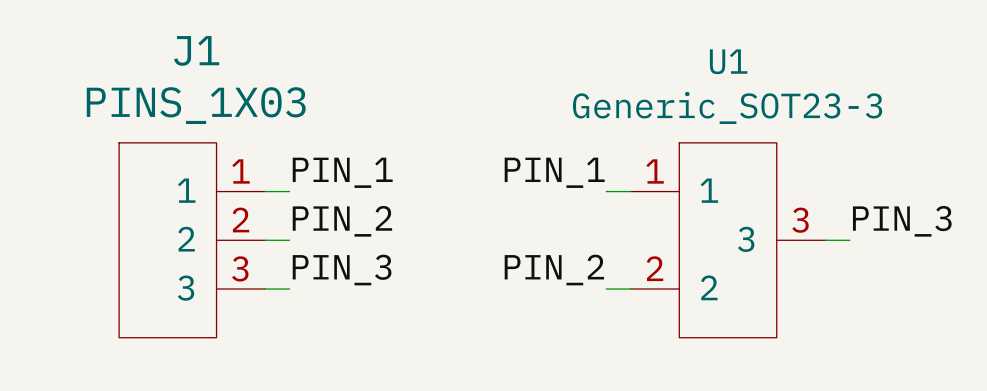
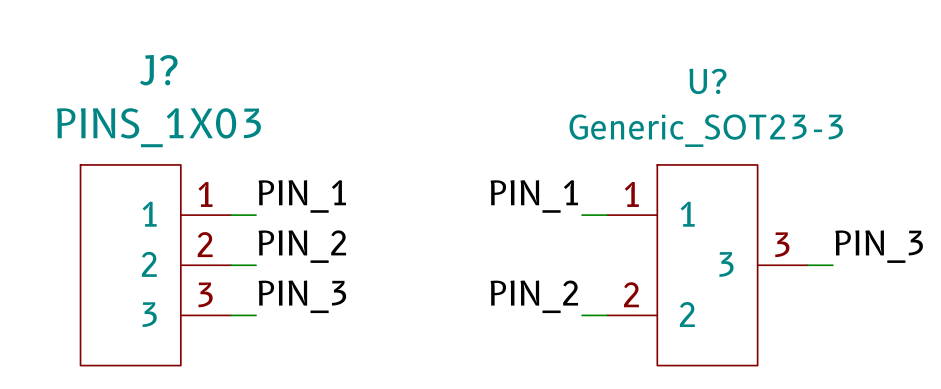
J1 name: J1 (196, 50) -> J? (158, 70)
U1 name: U1 (728, 61) -> U? (707, 81)

